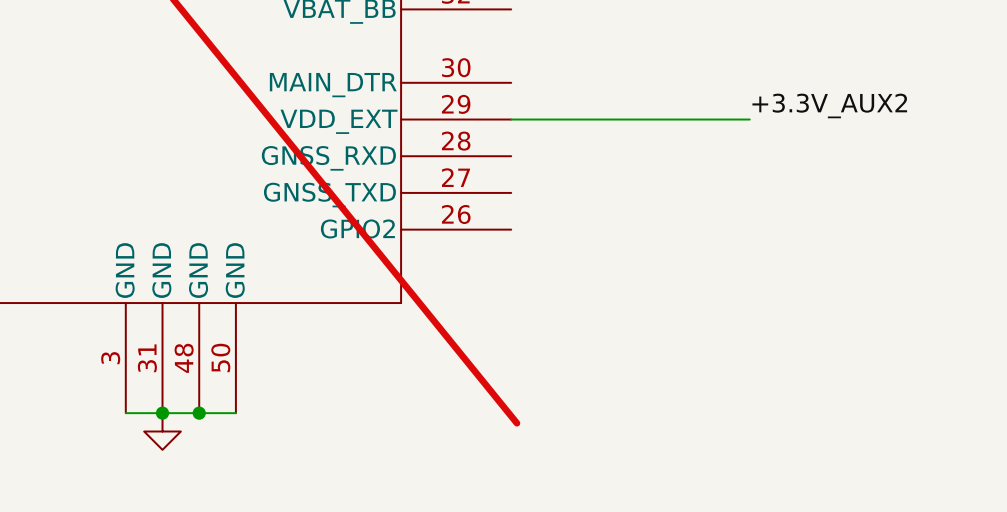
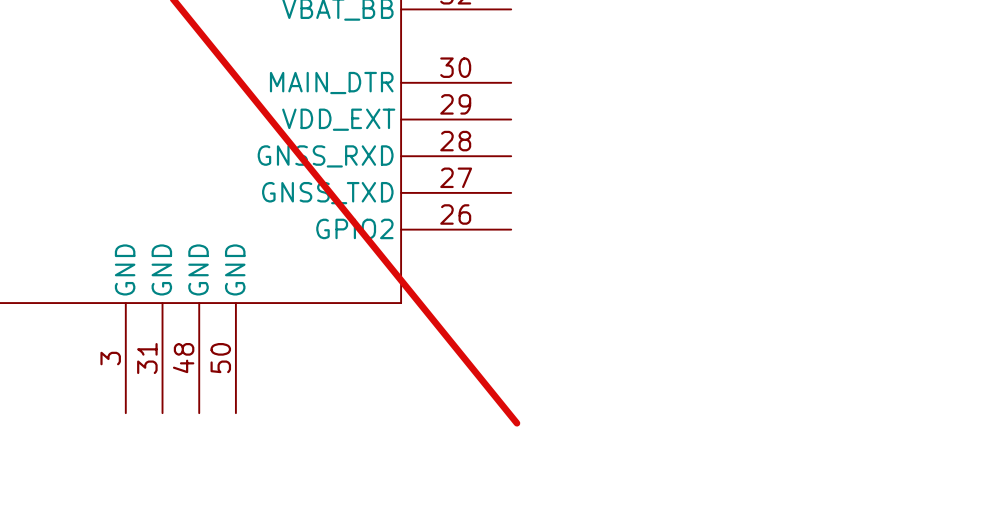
label: +3.3V_AUX2 (829, 105) -> none
wire: (511, 119) (749, 119) -> none
wire: (125, 413) (235, 413) -> none
junction: (162, 413) -> none
junction: (199, 413) -> none
power symbol: (162, 431) -> none

